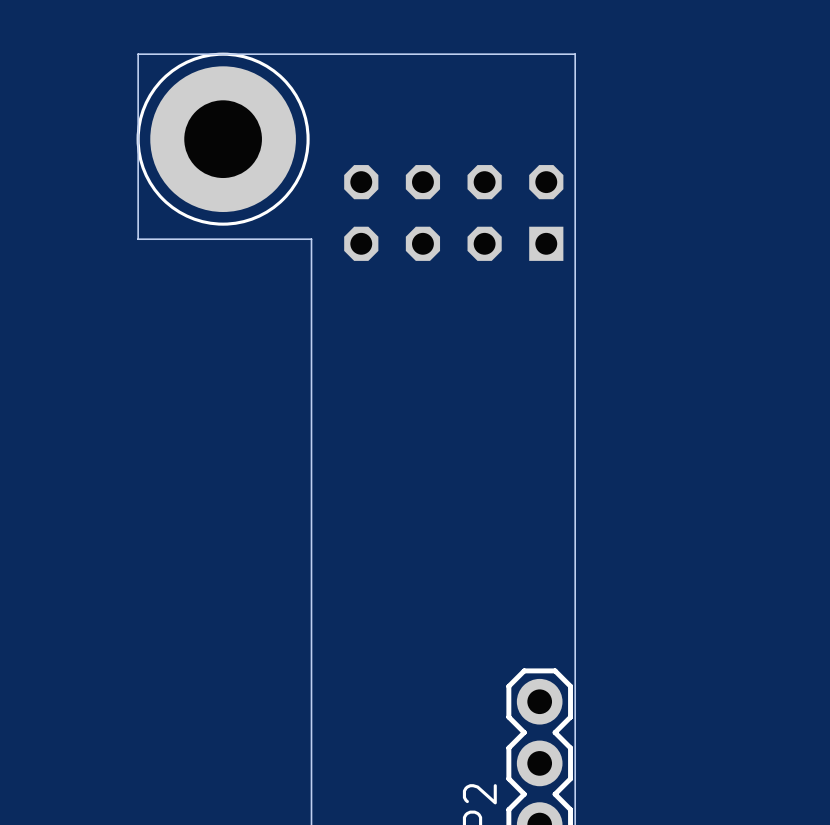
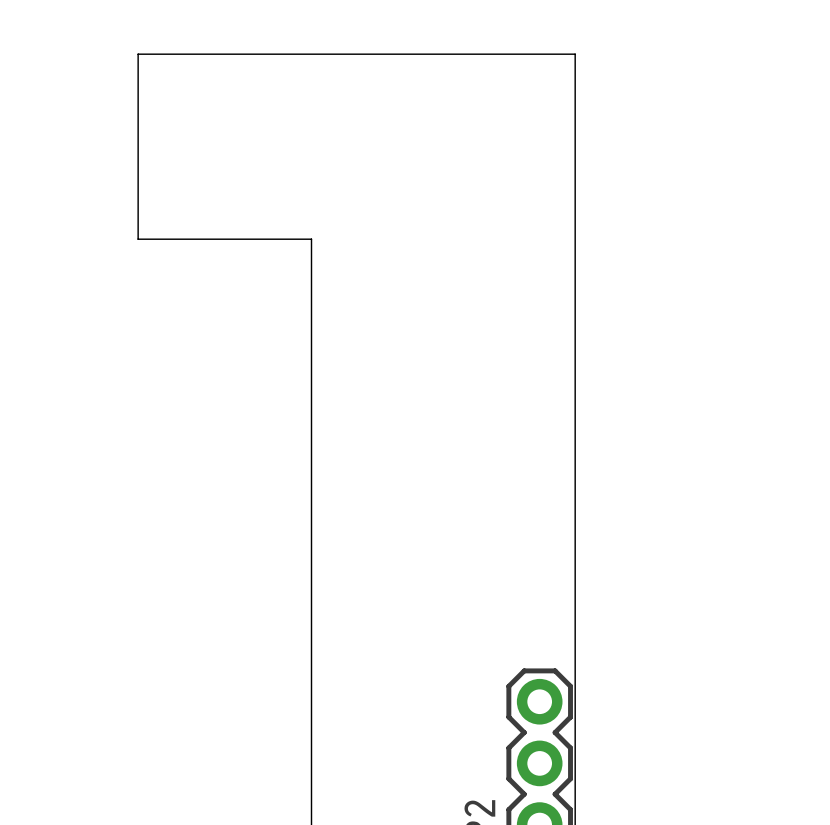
part: (223, 139) -> none
part: (453, 212) -> none

